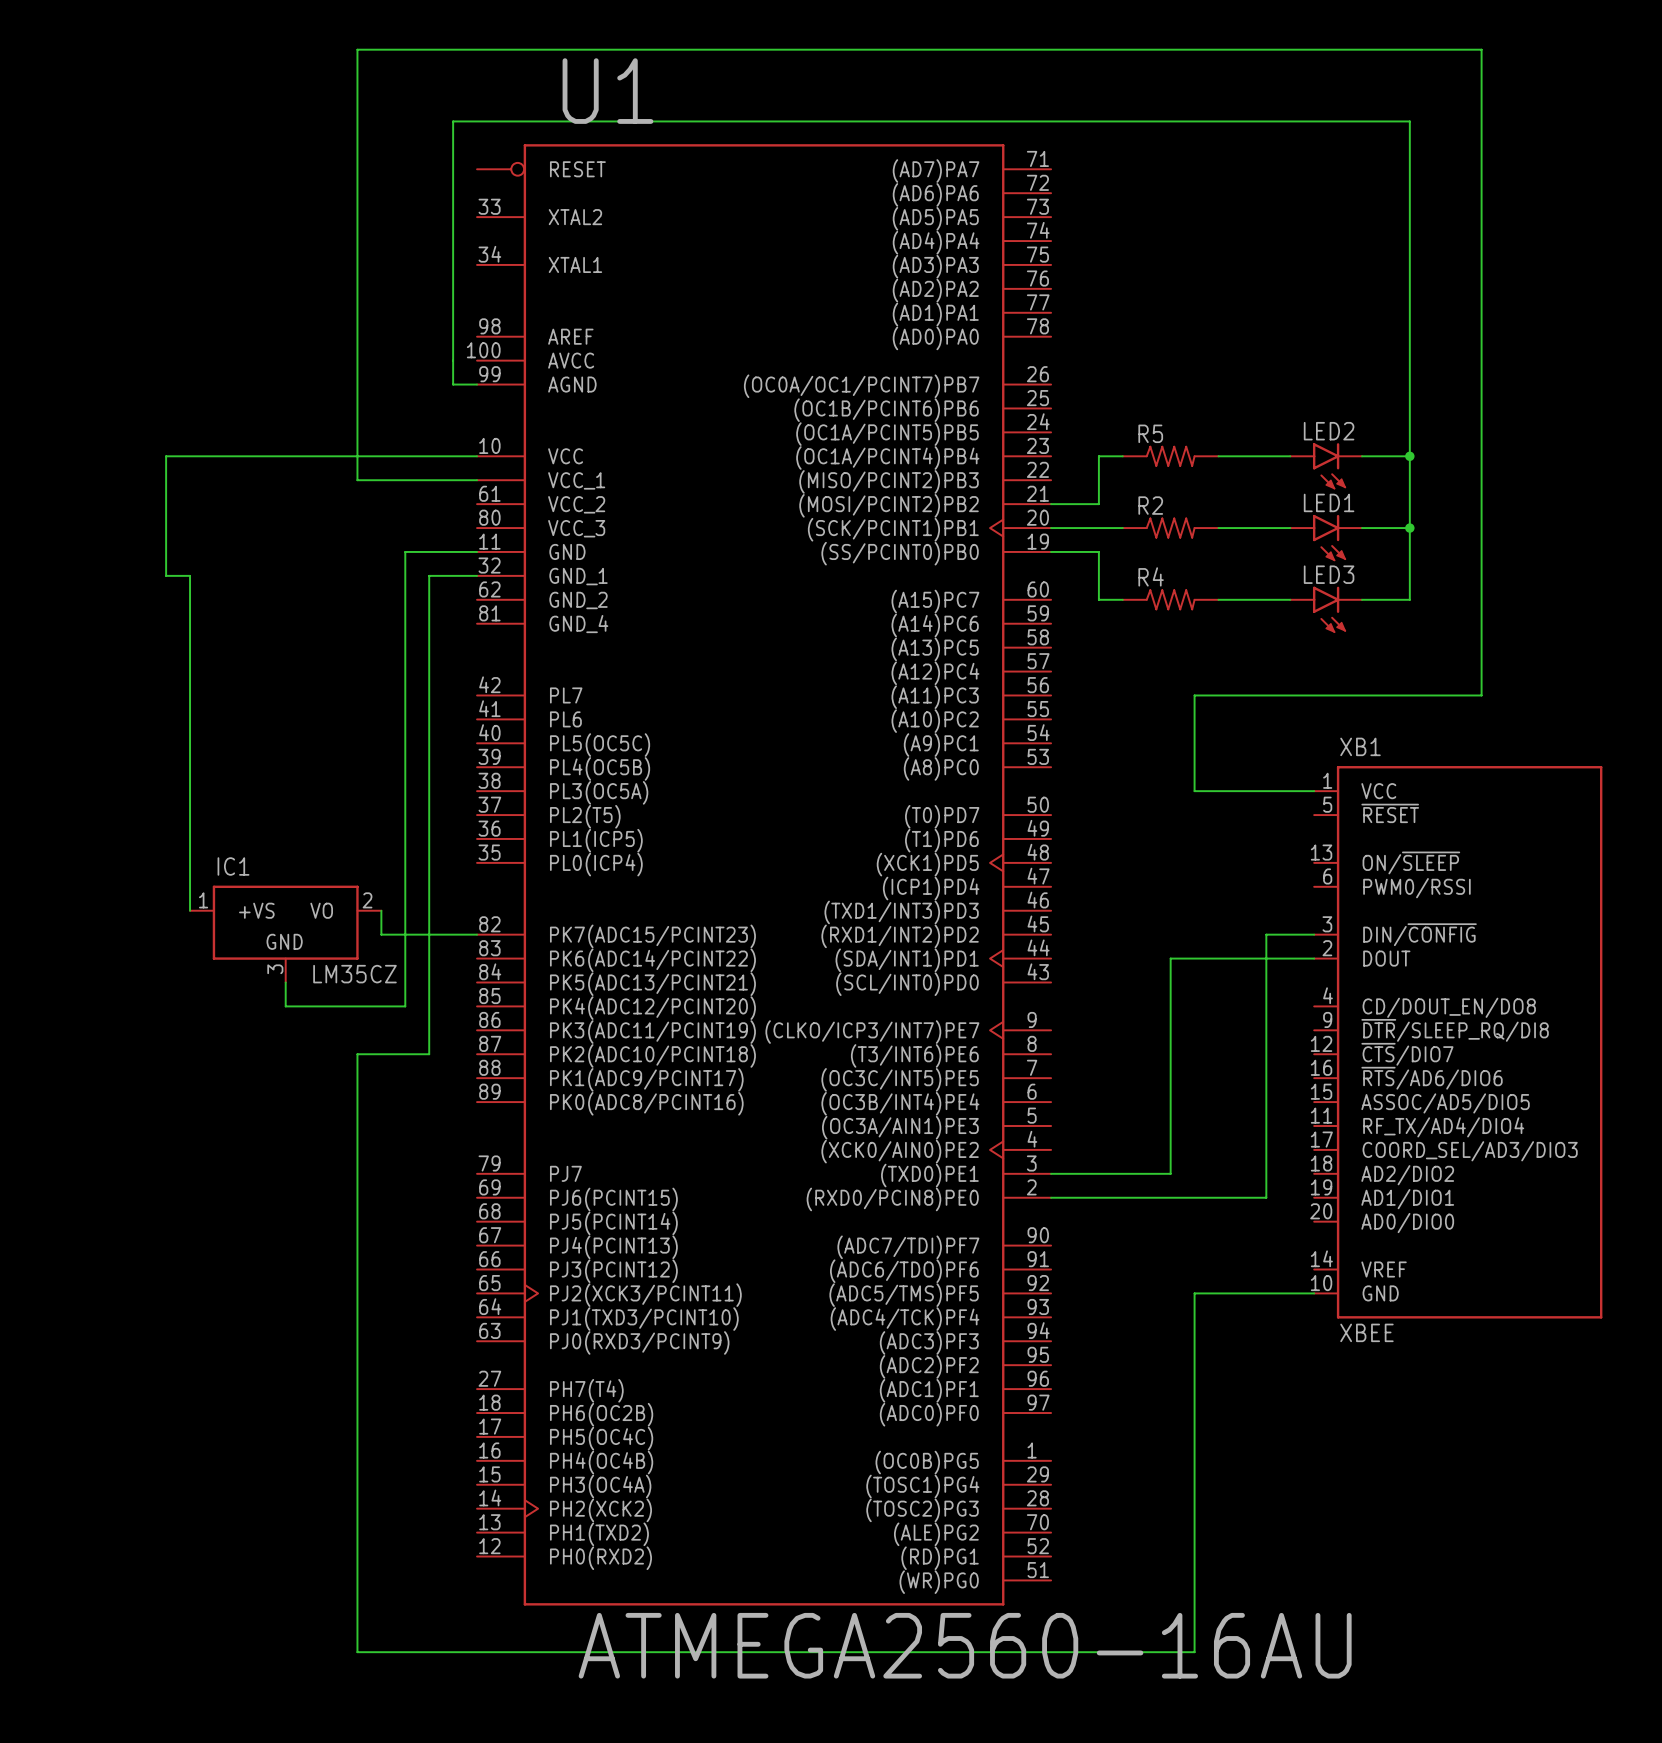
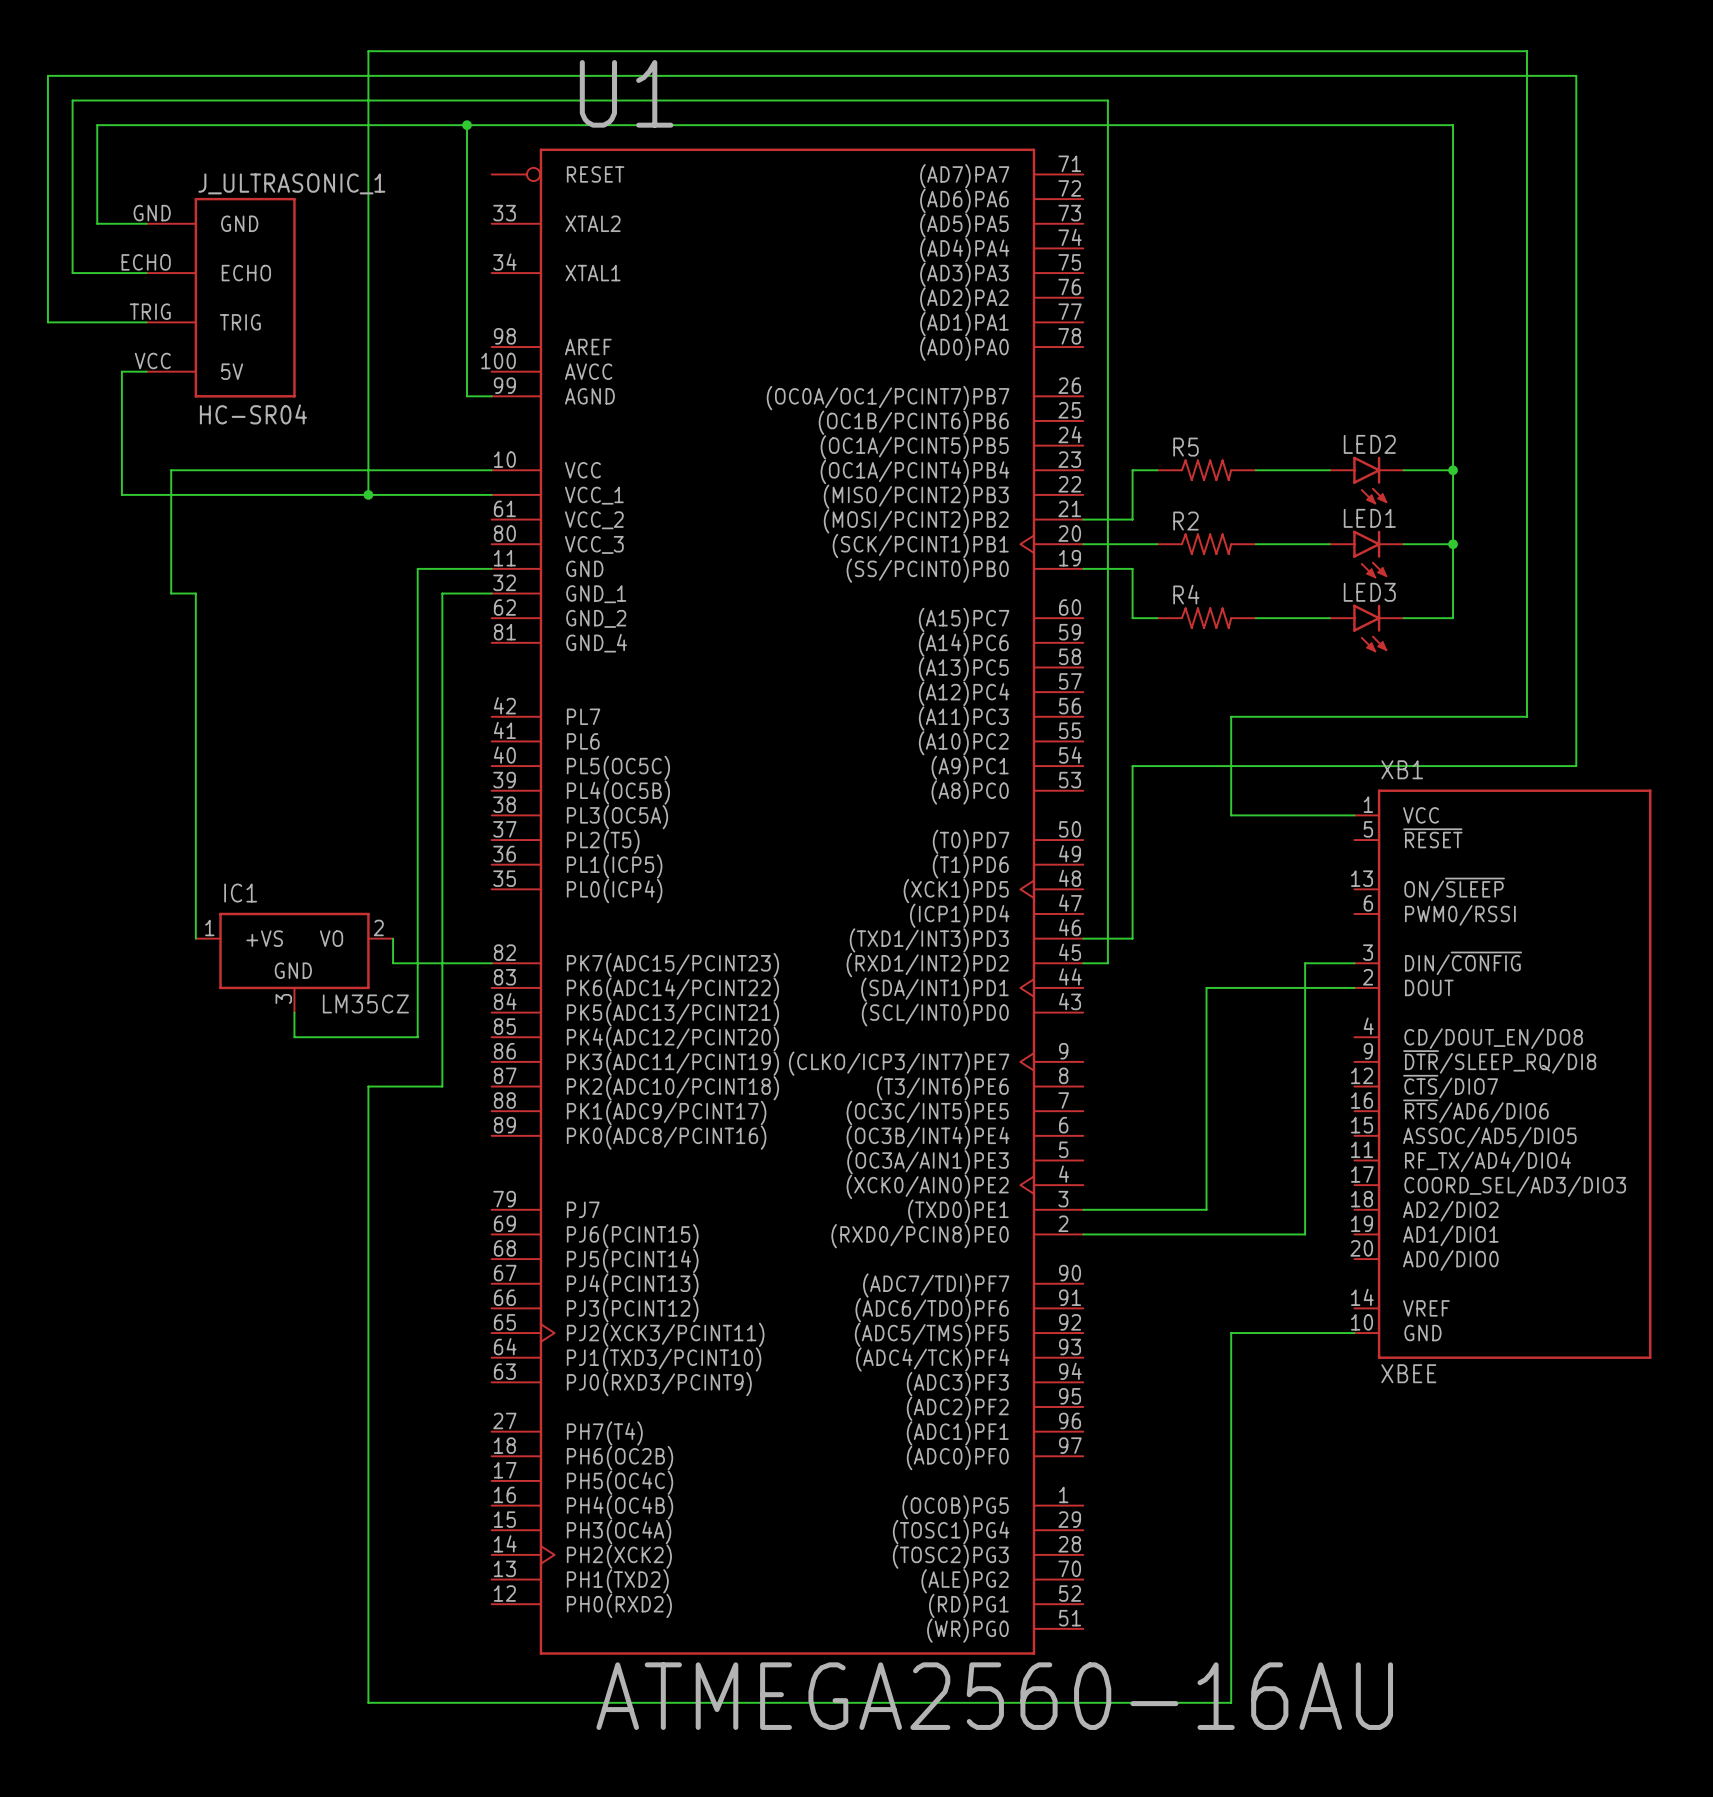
wire: none -> (467, 125) (97, 125) (97, 223) (146, 223)
junction: none -> (467, 125)
wire: none -> (146, 273) (72, 273) (72, 100) (1107, 100) (1107, 963) (1083, 963)
J_ULTRASONIC_1: none -> HC-SR04 (221, 297)
wire: none -> (146, 322) (47, 322) (47, 75) (1576, 75) (1576, 766) (1132, 766) (1132, 938) (1083, 938)
wire: none -> (146, 371) (121, 371) (121, 494) (368, 494)
junction: none -> (368, 494)

